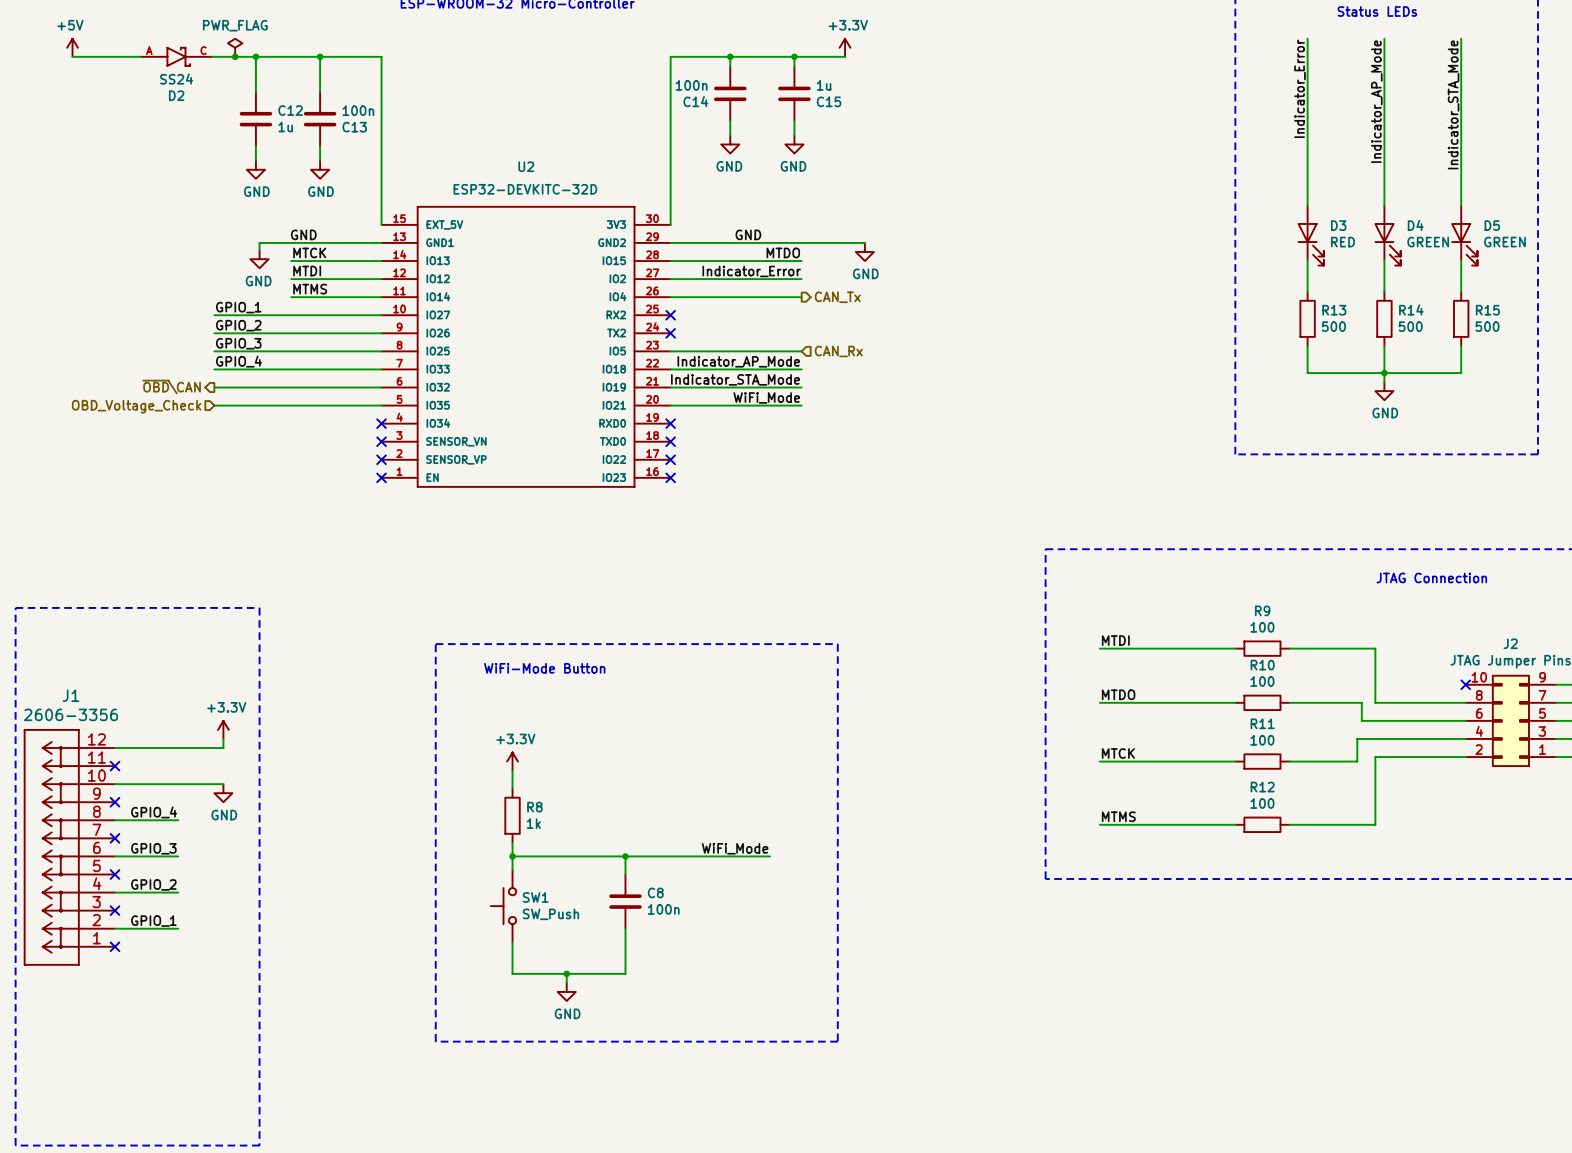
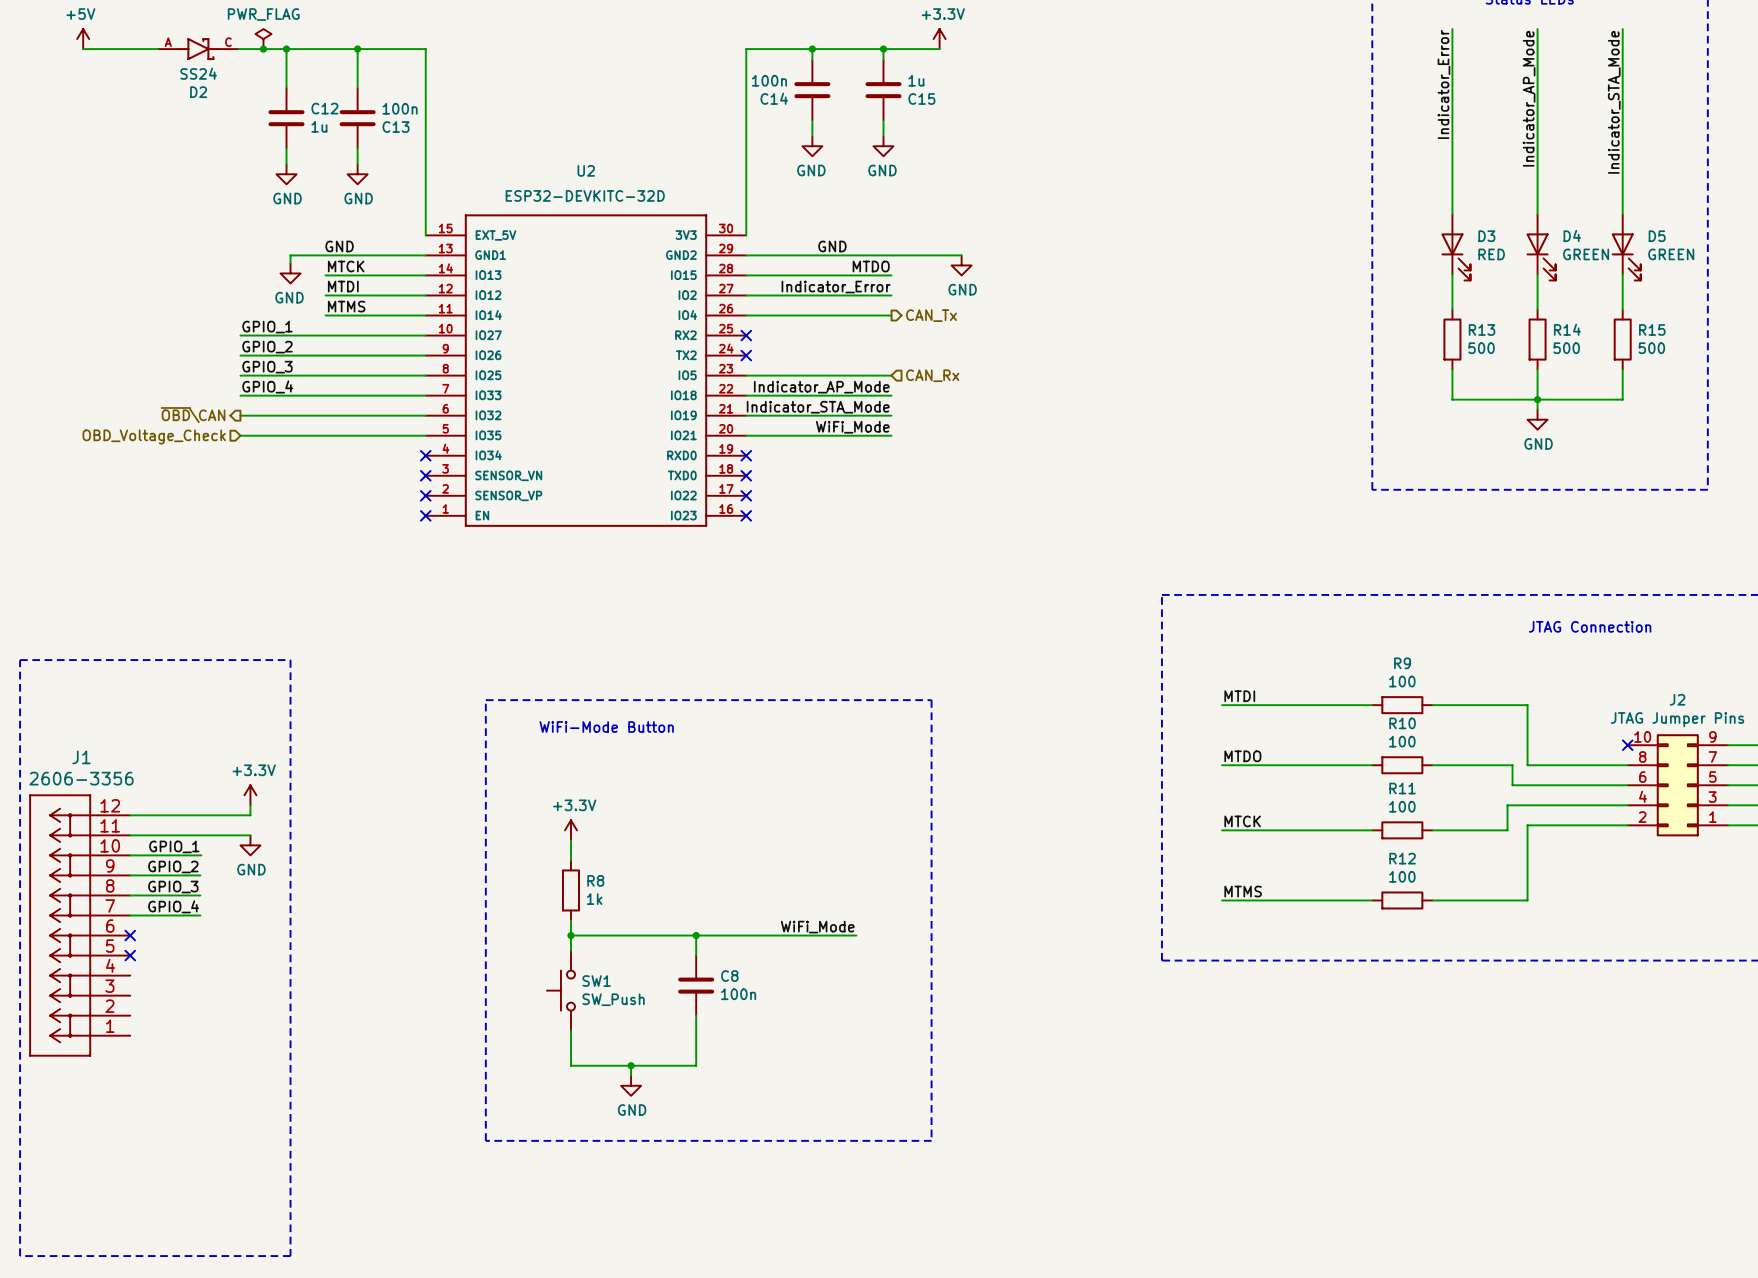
wire: none -> (130, 835) (250, 835)
no-connect mark: (114, 766) -> none
wire: (179, 784) (223, 784) -> none
power symbol position: GND (223, 793) -> GND (250, 845)
no-connect mark: (114, 802) -> none
label: GPIO_4 (154, 812) -> GPIO_3 (173, 887)
no-connect mark position: (114, 838) -> (130, 935)
label: GPIO_3 (153, 848) -> GPIO_4 (173, 906)
wire: (114, 856) (178, 856) -> (130, 875) (200, 875)
label position: GPIO_2 (153, 884) -> GPIO_2 (173, 866)
wire: (114, 892) (178, 892) -> (130, 915) (200, 915)
no-connect mark: (114, 910) -> none
label position: GPIO_1 (153, 921) -> GPIO_1 (174, 846)
wire: (114, 928) (178, 928) -> none
no-connect mark: (114, 946) -> none

